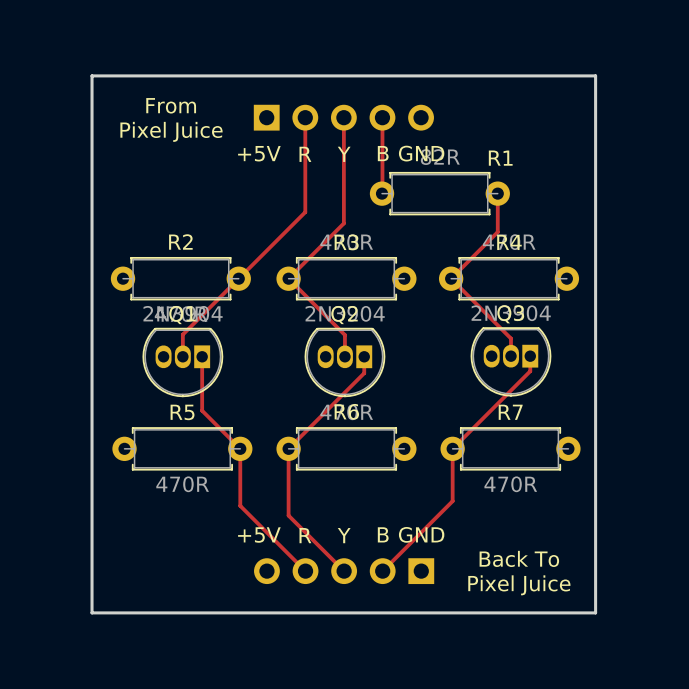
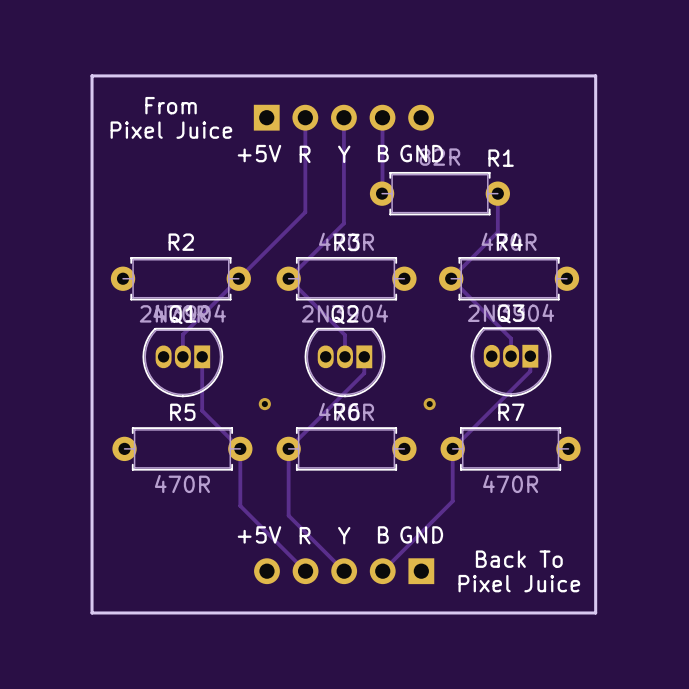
via: none -> (264, 404)
via: none -> (429, 404)

